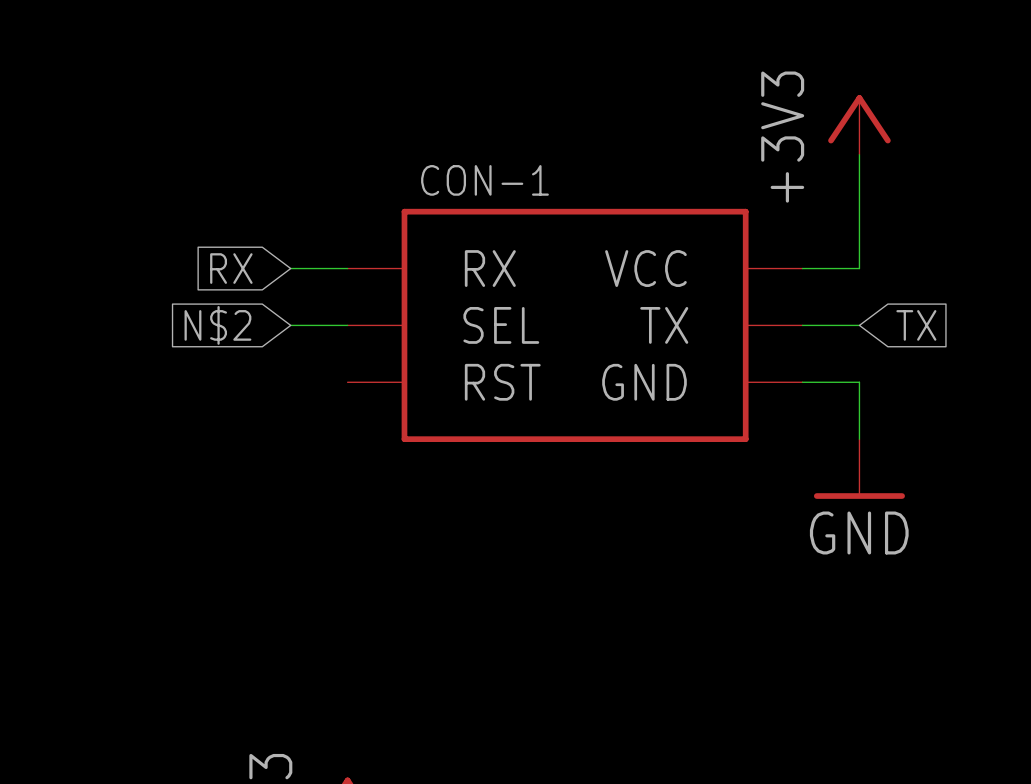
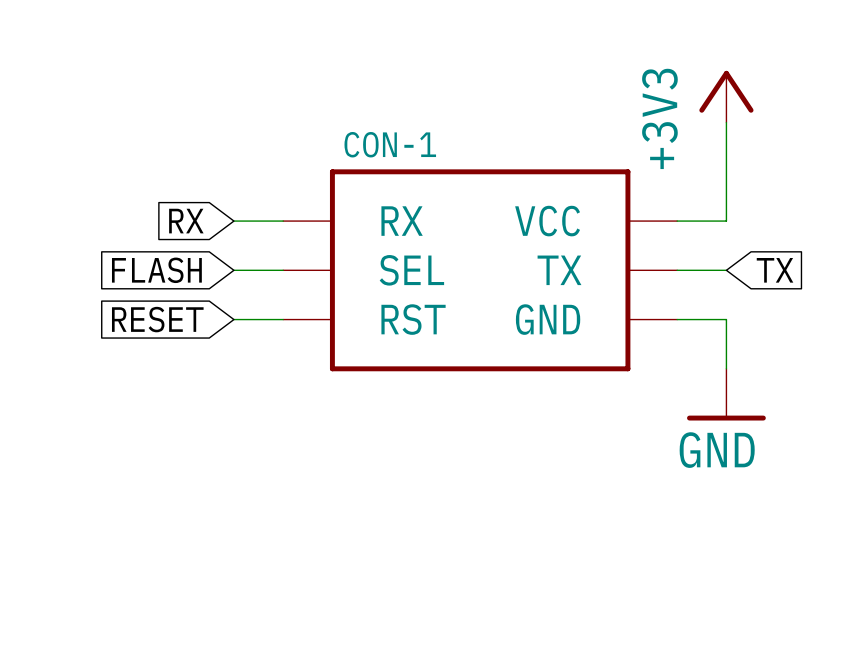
global label: N$2 (217, 325) -> FLASH (156, 270)
global label: none -> RESET (157, 319)
wire: none -> (233, 319) (283, 319)

